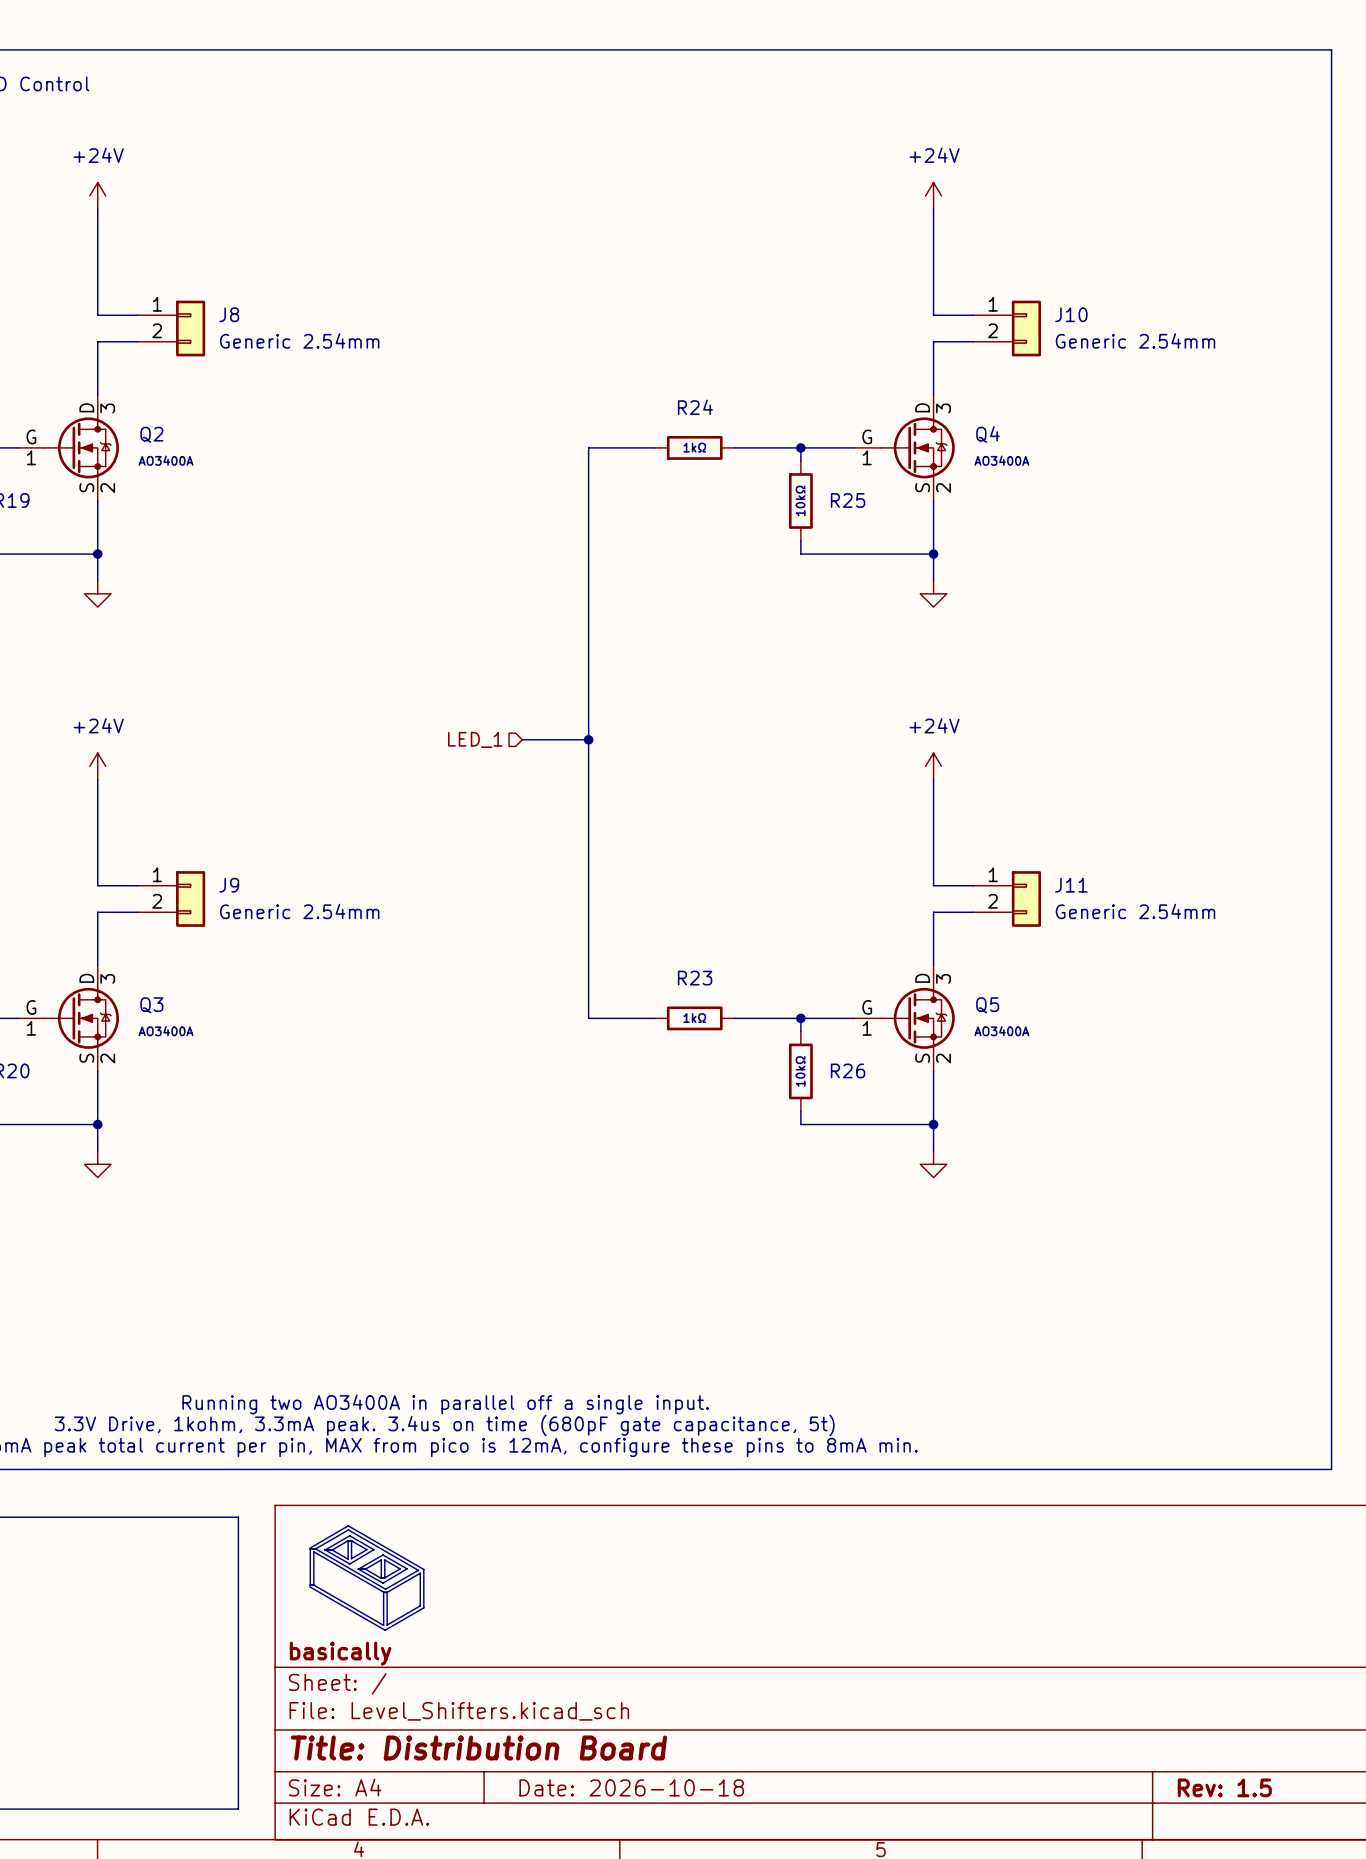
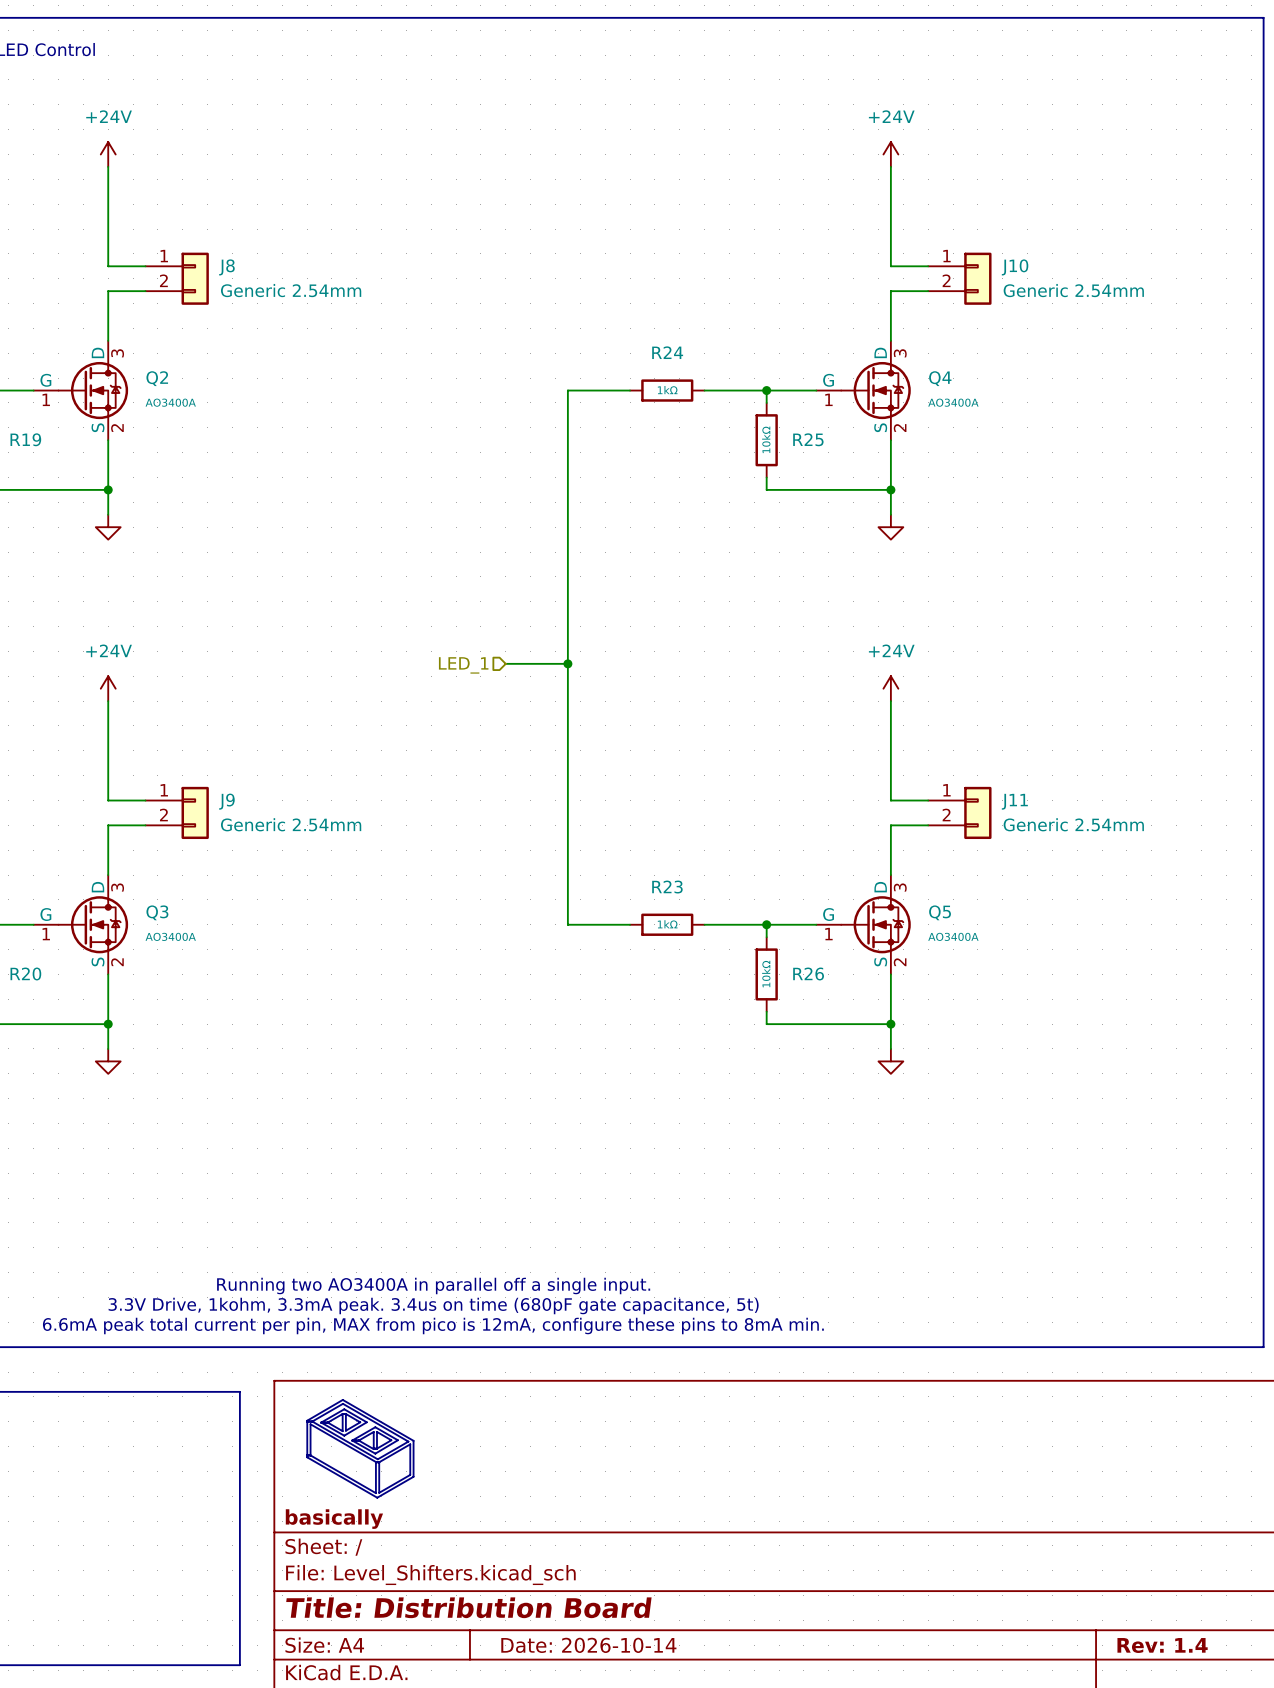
title block: Date: 2026-10-18 (631, 1787) -> Date: 2026-10-14 (588, 1645)
title block: Rev: 1.5 (1224, 1787) -> Rev: 1.4 (1162, 1645)

